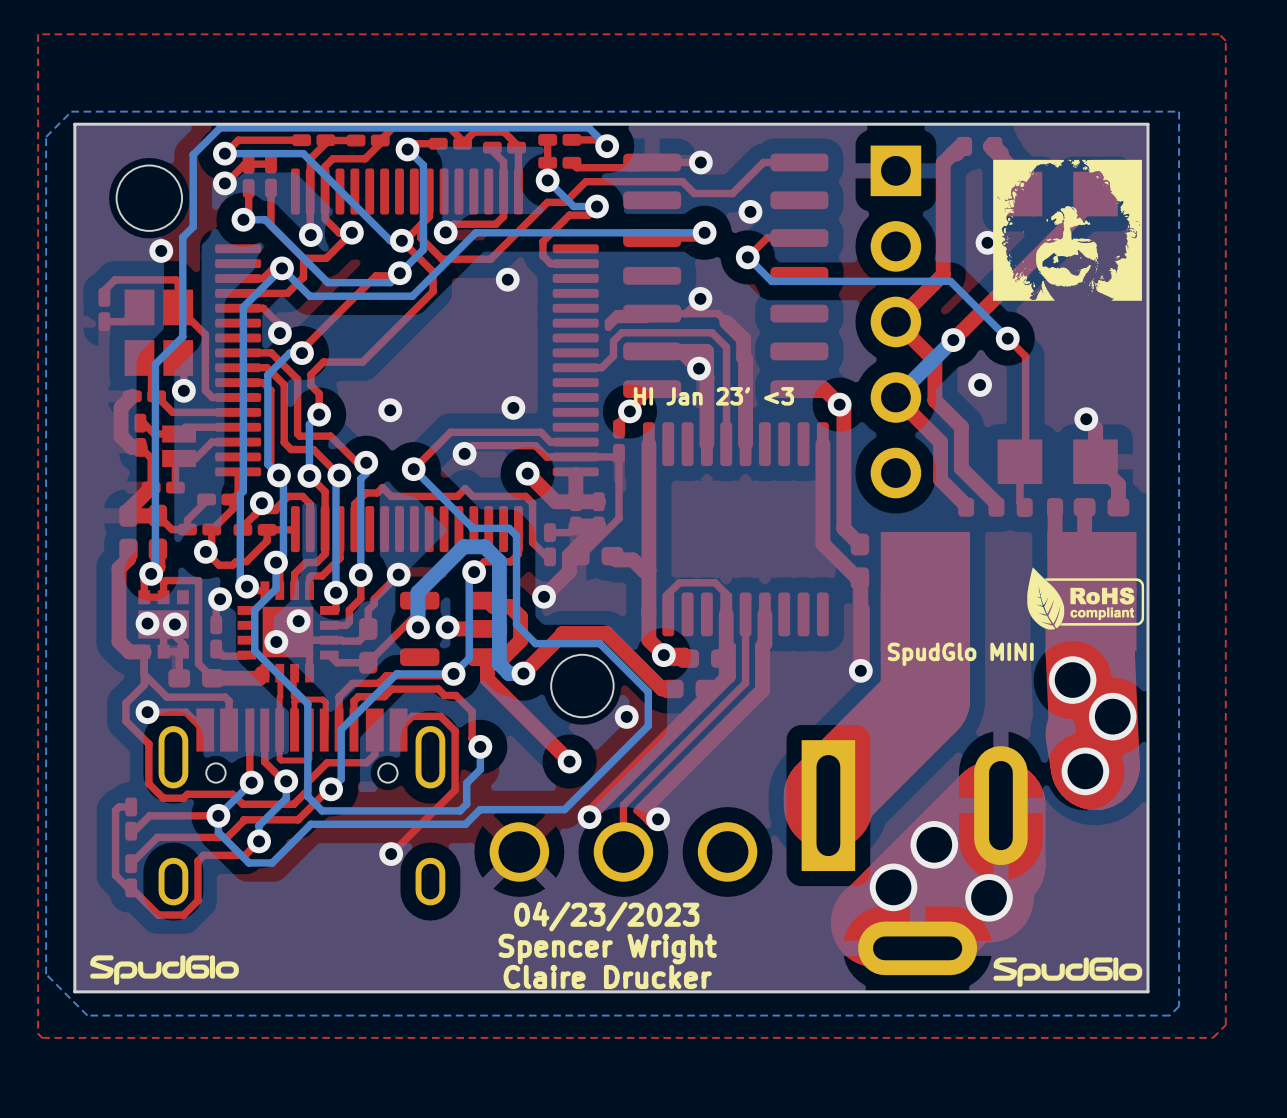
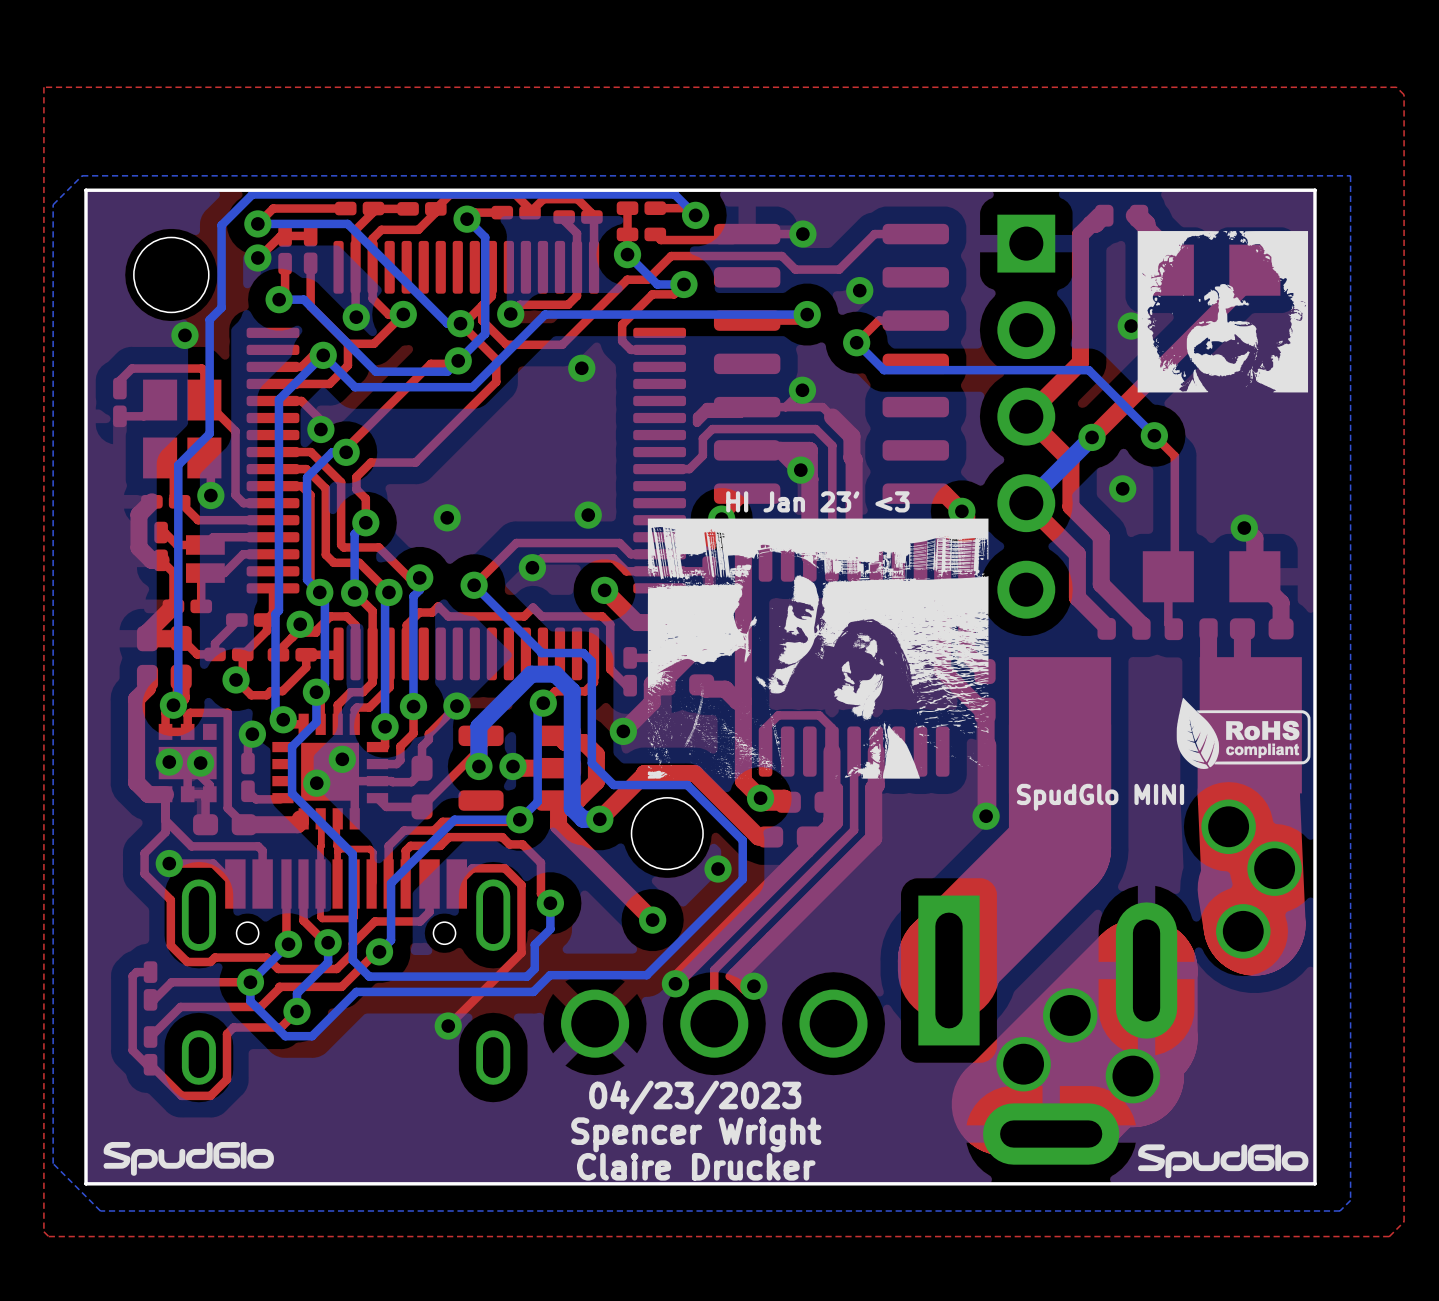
drawing: none -> [647, 518, 989, 779]

